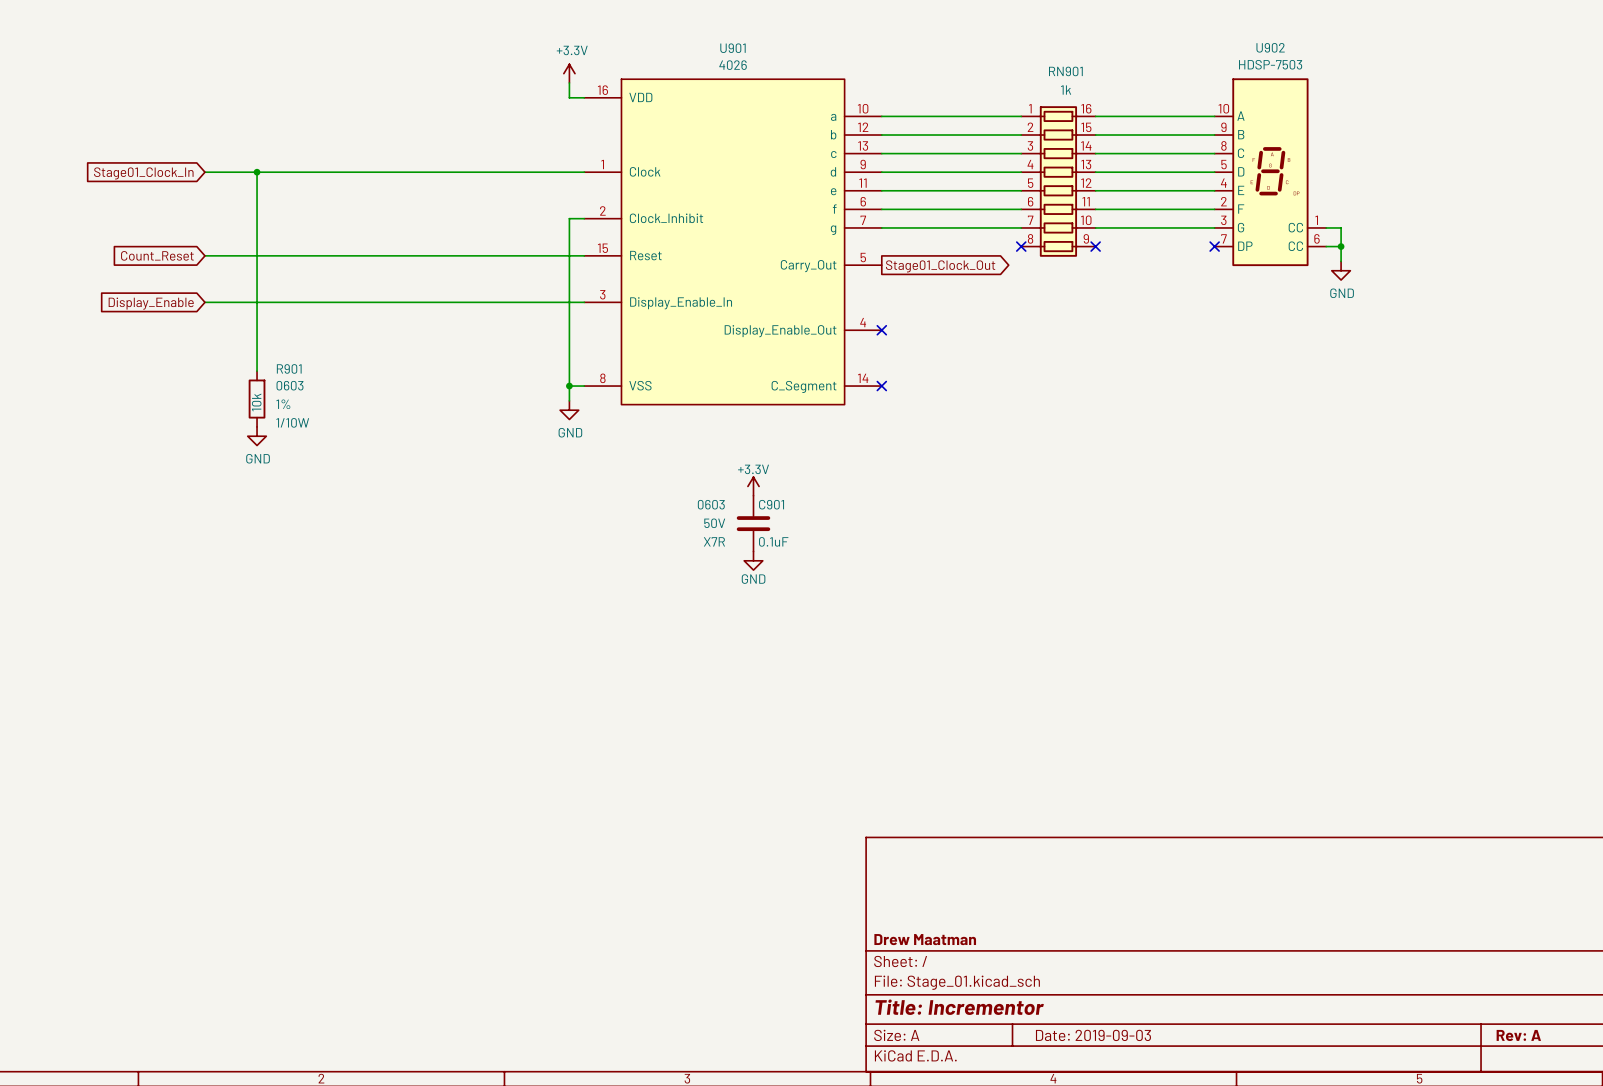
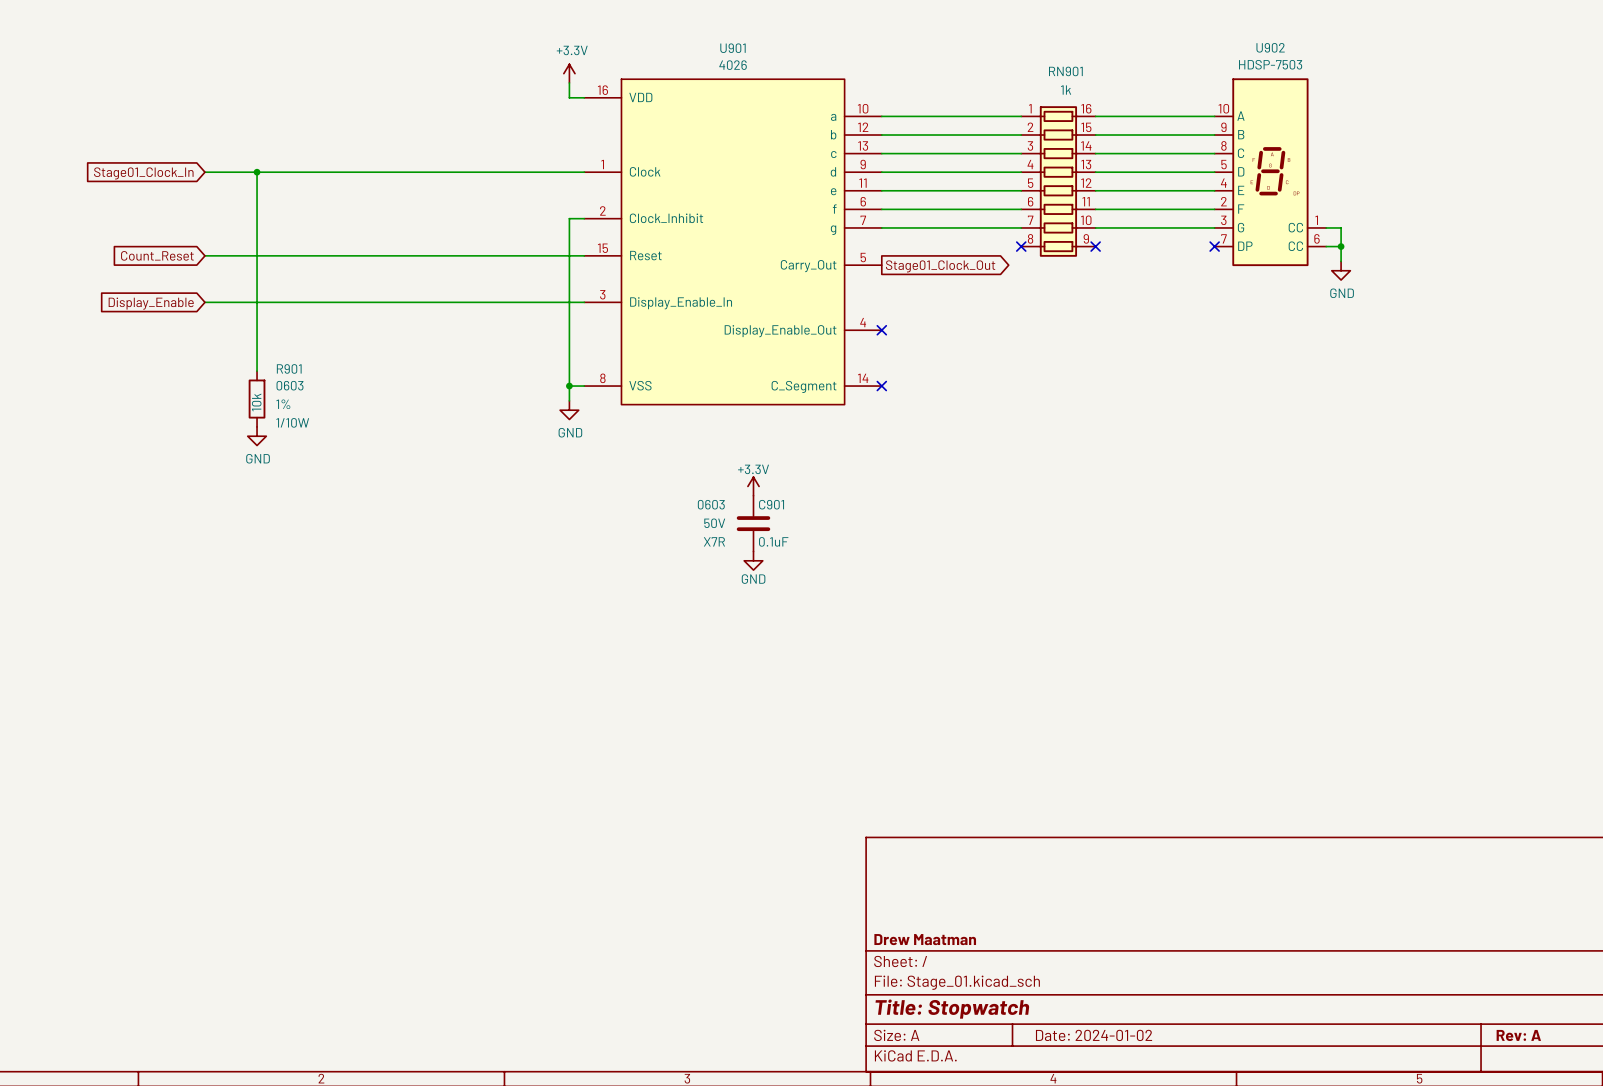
title block: Title: Incrementor (959, 1007) -> Title: Stopwatch (952, 1009)
title block: Date: 2019-09-03 (1093, 1035) -> Date: 2024-01-02 (1094, 1035)

